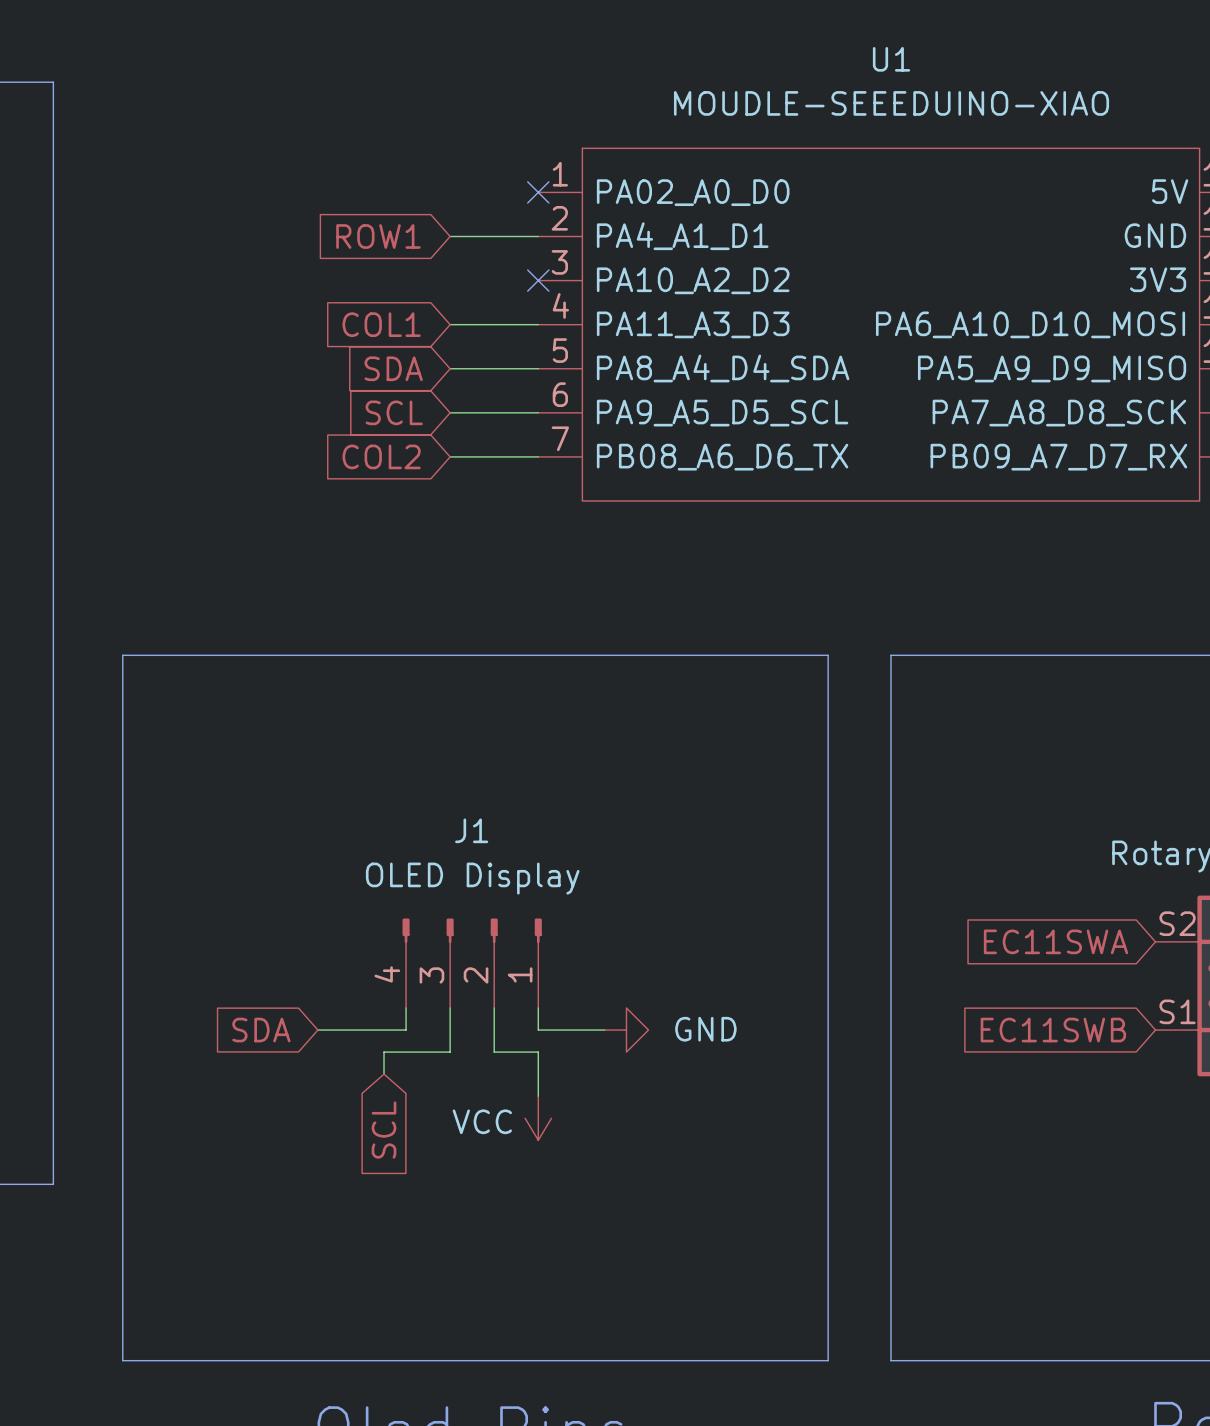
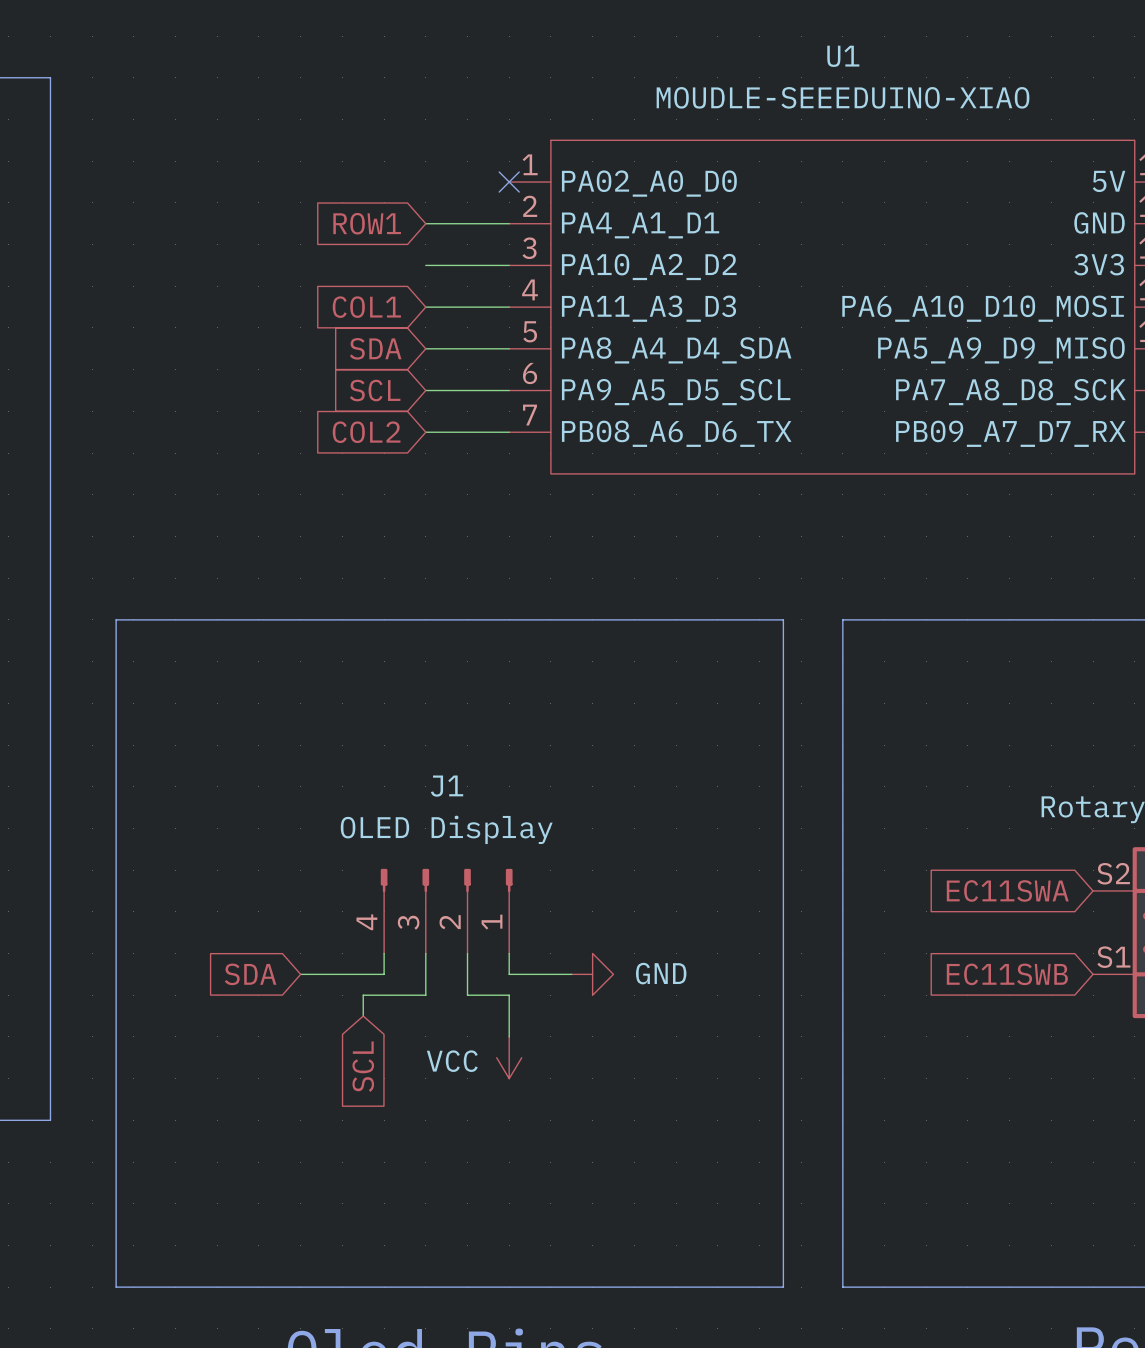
wire: none -> (425, 265) (509, 265)
no-connect mark: (538, 280) -> none

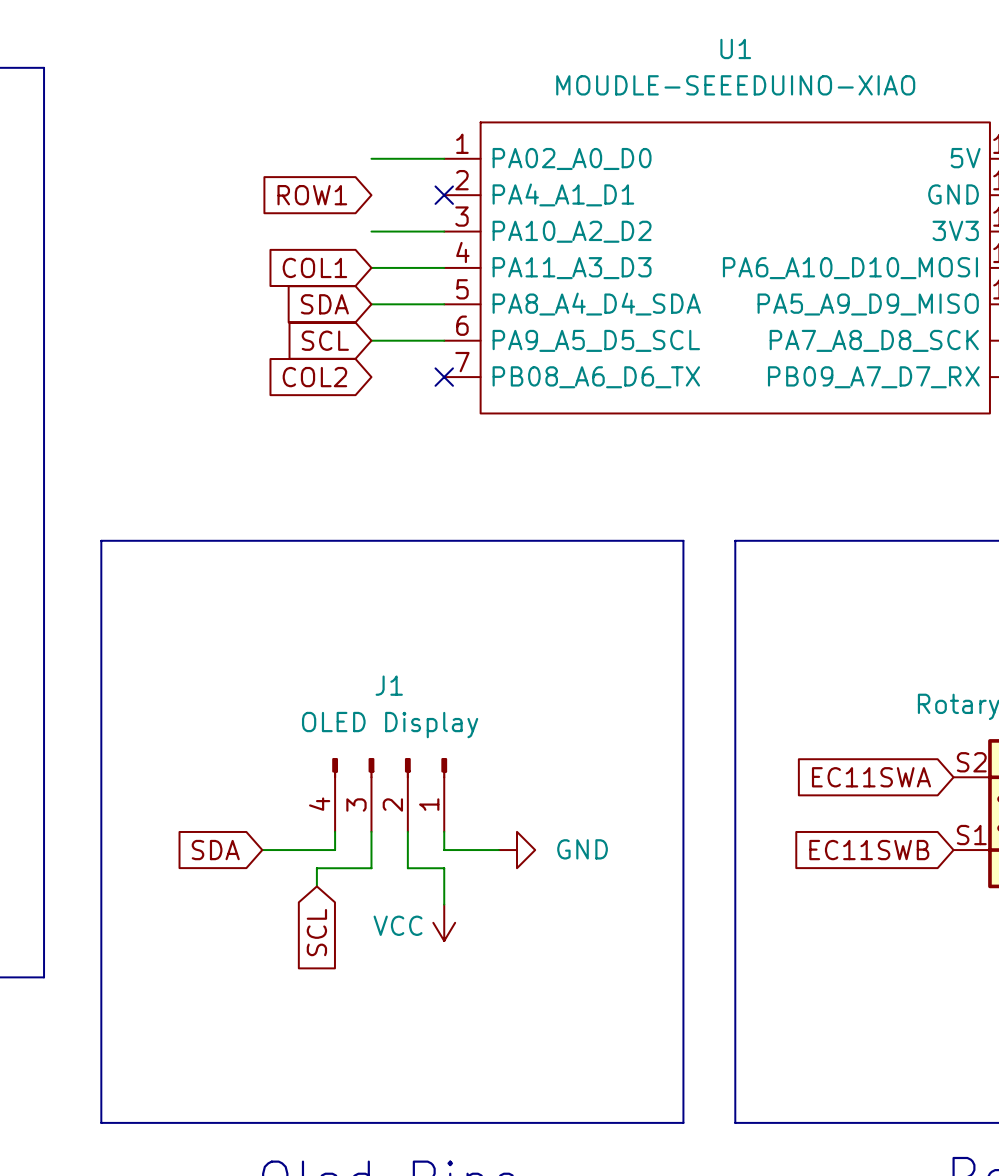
no-connect mark position: (509, 182) -> (444, 195)
wire: (425, 223) (509, 223) -> (371, 158) (444, 158)
wire: (425, 432) (509, 432) -> none
no-connect mark: none -> (444, 377)

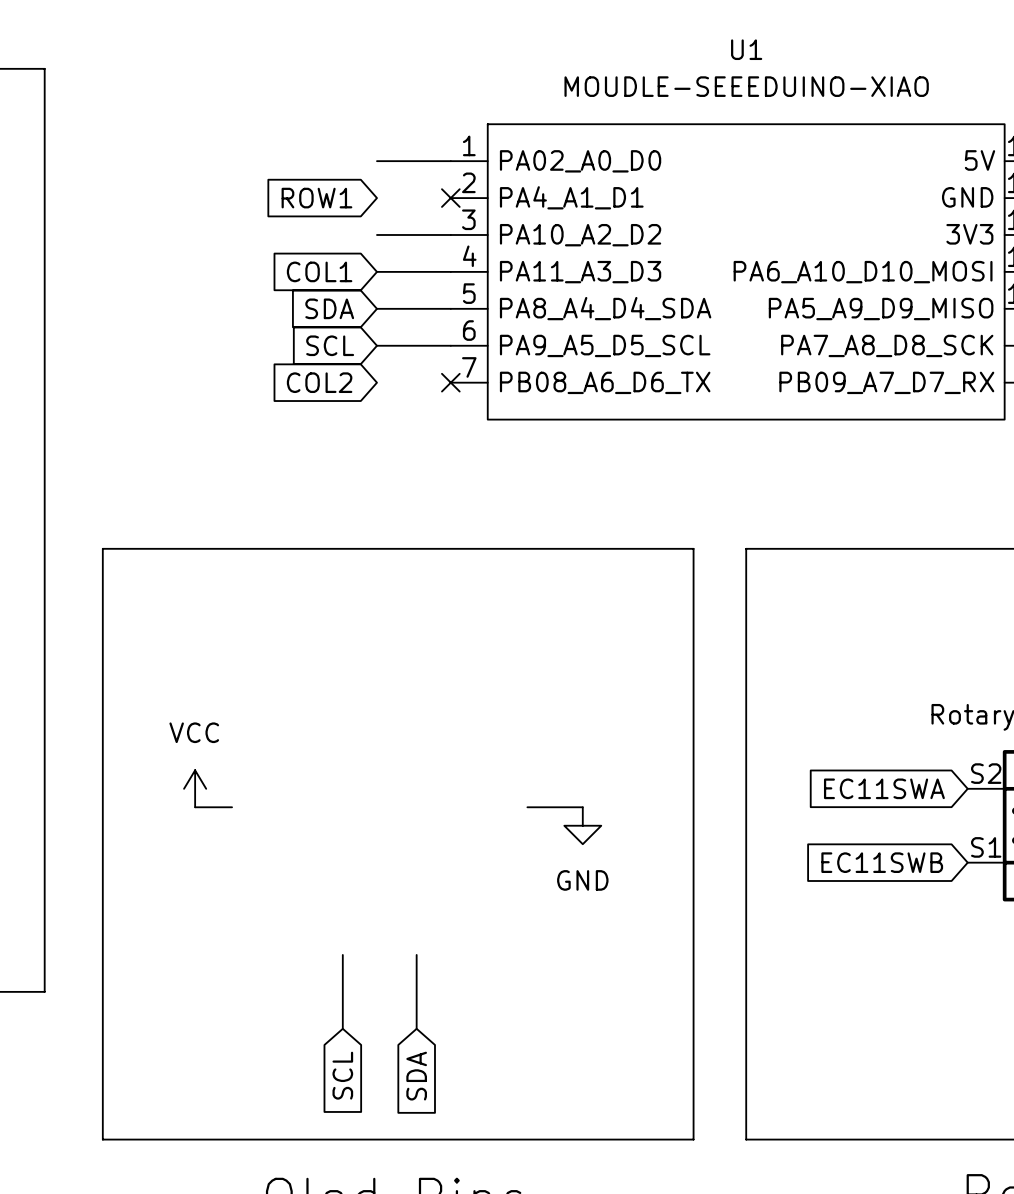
J1: OLED Display (389, 794) -> none
wire: none -> (195, 807) (232, 807)
wire: none -> (527, 807) (582, 807)
wire: (335, 831) (335, 850) (262, 850) -> none
wire: (371, 831) (371, 868) (316, 868) (316, 886) -> none
wire: (407, 831) (407, 868) (444, 868) (444, 904) -> none
wire: (444, 831) (444, 850) (498, 850) -> none
global label rotation: 0° (215, 850) -> 90° counterclockwise (416, 1076)
global label position: SDA (215, 850) -> SDA (416, 1076)
power symbol rotation: 0° (517, 850) -> 90° clockwise (582, 825)
power symbol position: GND (517, 850) -> GND (582, 825)
power symbol rotation: 0° (444, 922) -> 180° (195, 788)
power symbol position: VCC (444, 922) -> VCC (195, 788)
power symbol text position: VCC (398, 925) -> VCC (194, 732)
global label position: SCL (316, 932) -> SCL (342, 1075)
wire: none -> (342, 954) (342, 1028)
wire: none -> (416, 954) (416, 1028)

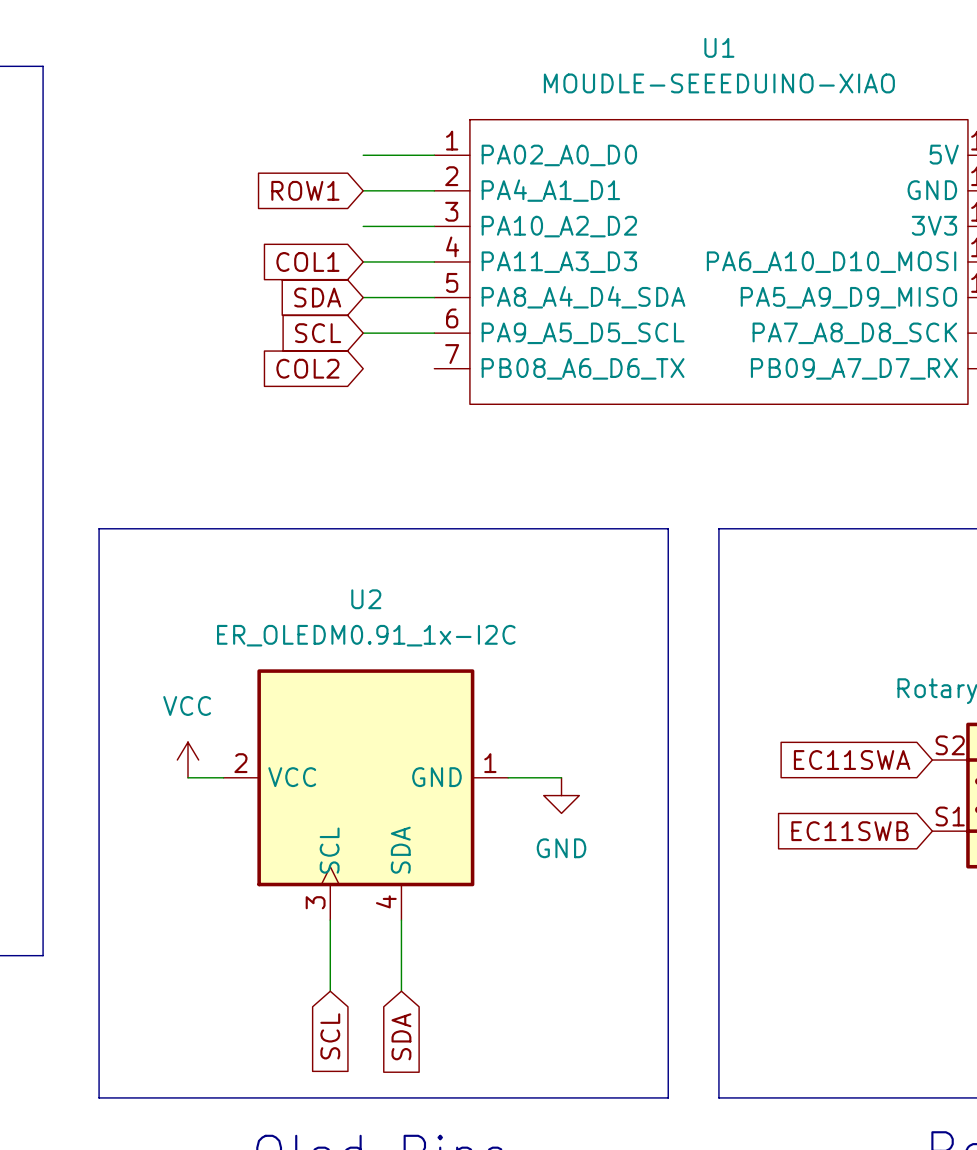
wire: none -> (363, 190) (434, 190)
no-connect mark: (450, 198) -> none
no-connect mark: (450, 382) -> none
U2: none -> ER_OLEDM0.91_1x-I2C (365, 794)

